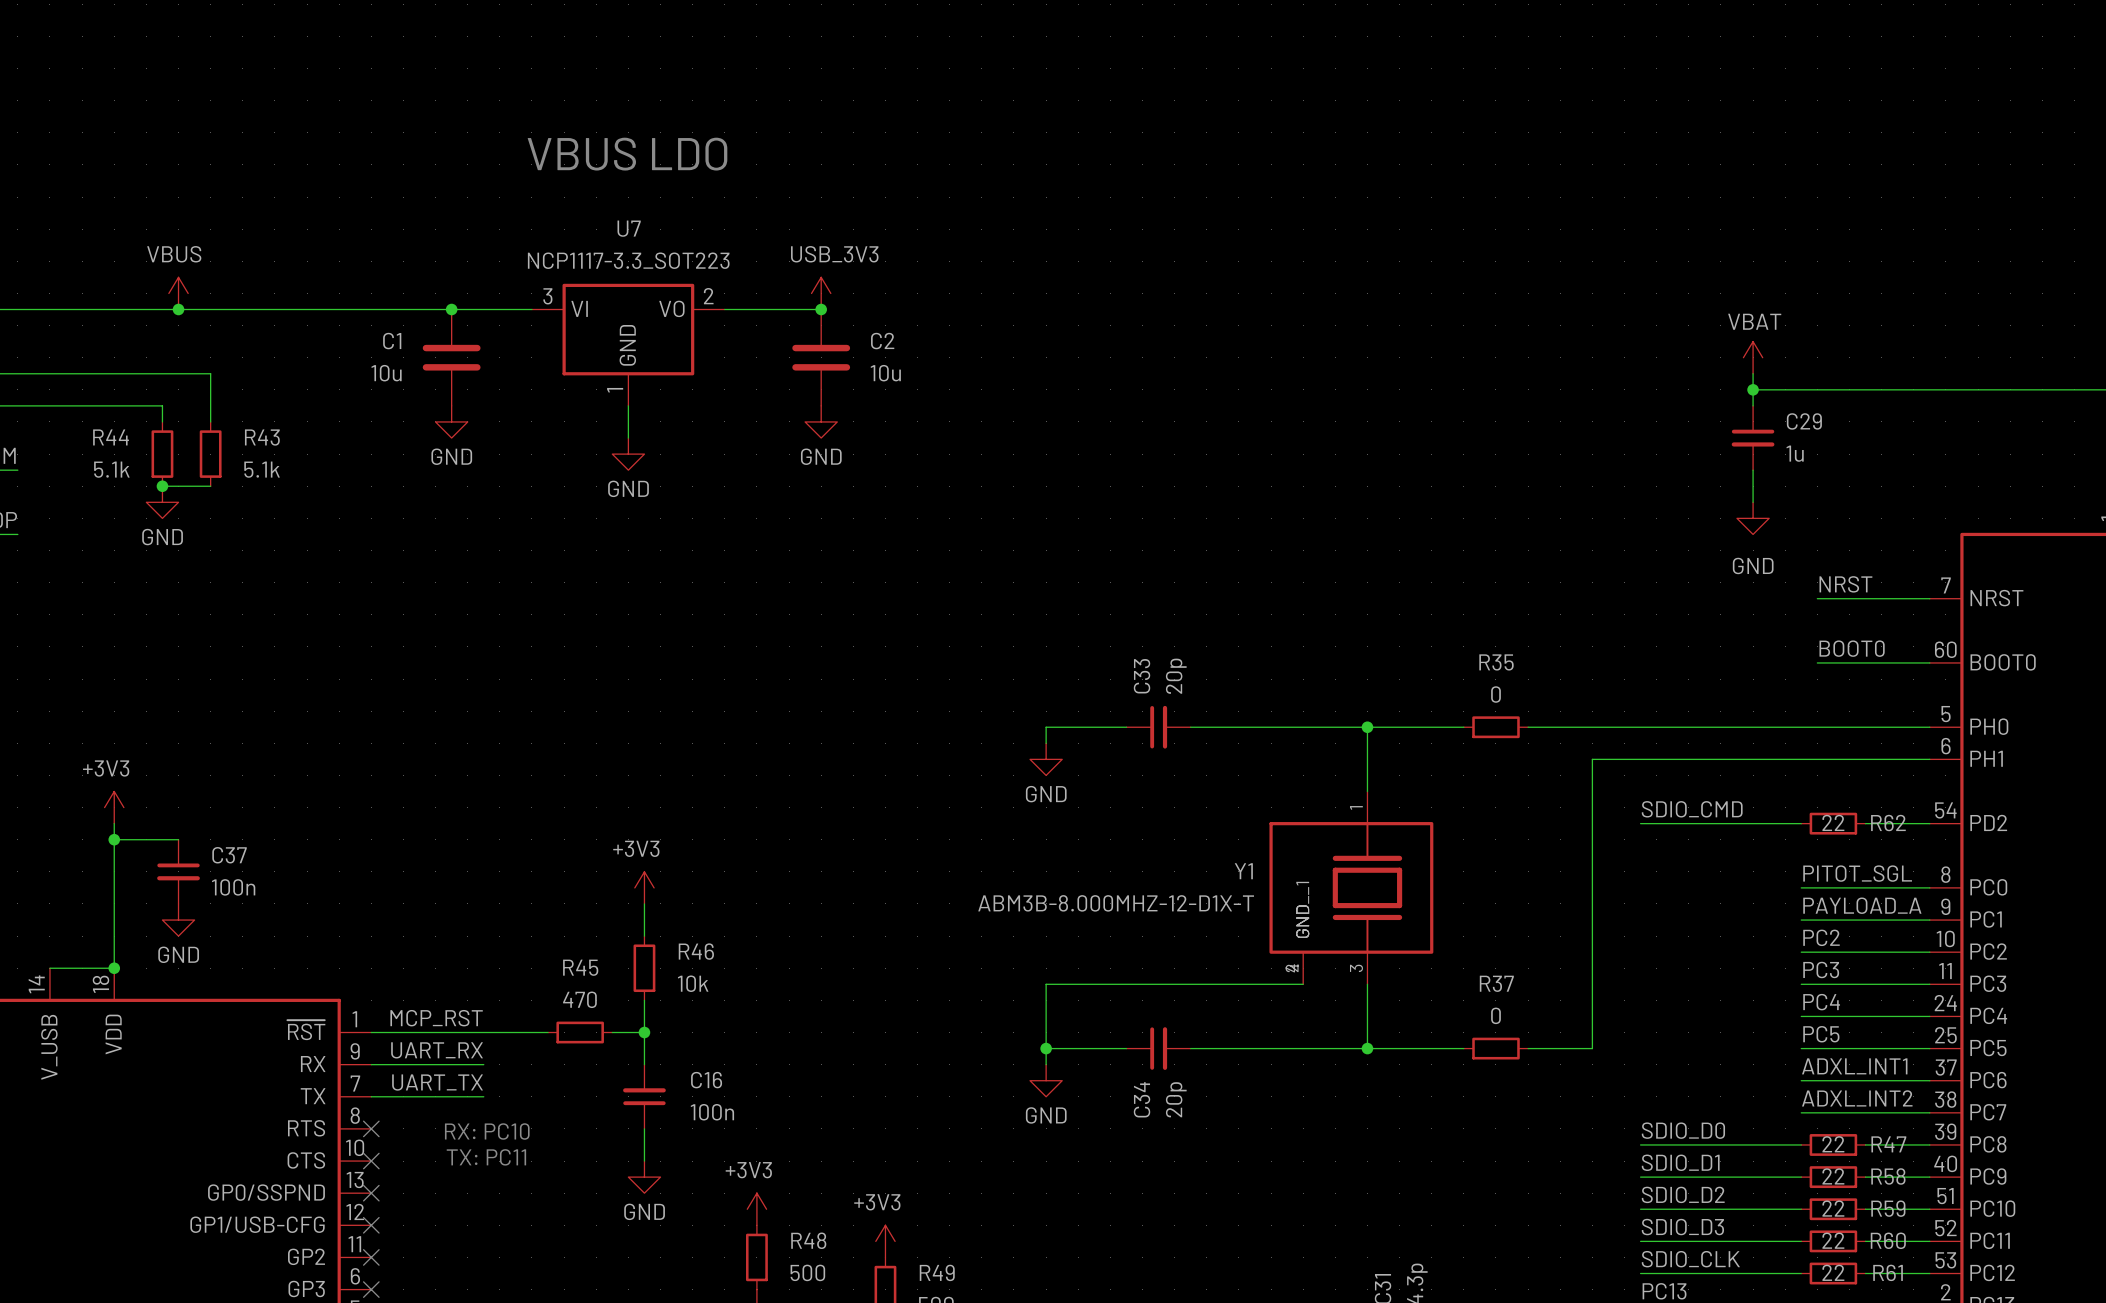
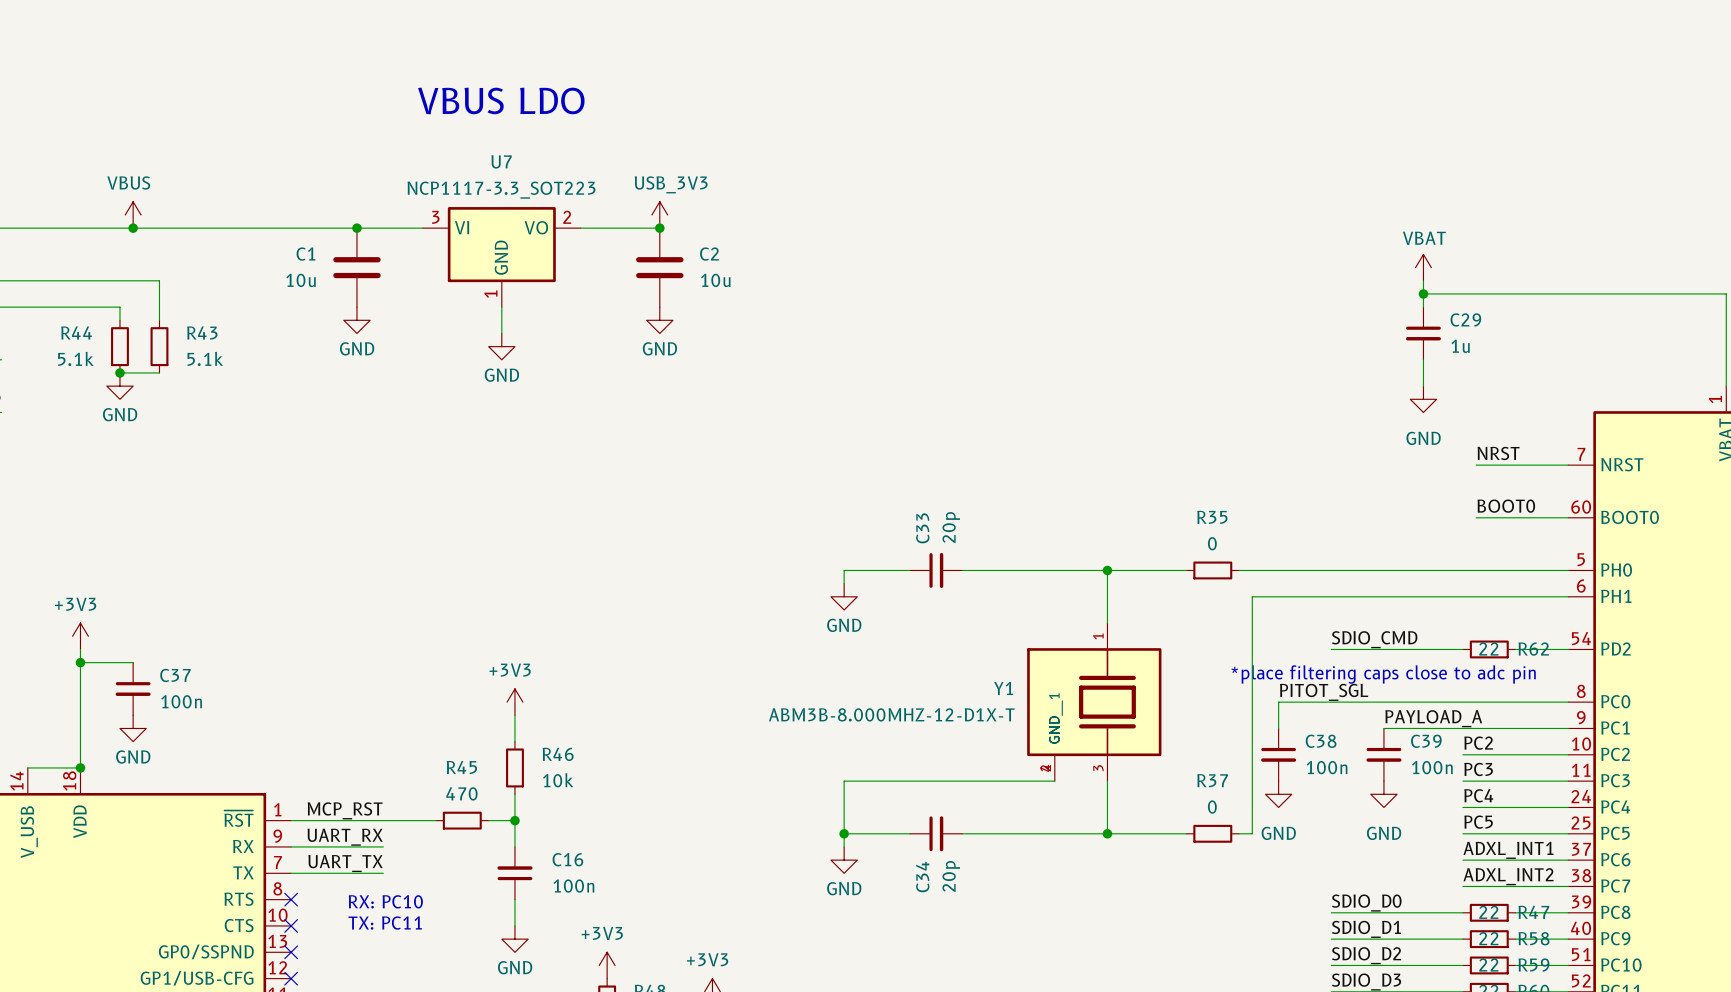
wire: (1592, 759) (1592, 1048) (1544, 1048) -> (1291, 596) (1252, 596) (1252, 833)
text: none -> *place filtering caps close to adc pin (1383, 674)
label position: PITOT_SGL (1857, 873) -> PITOT_SGL (1324, 692)
wire: none -> (1462, 702) (1278, 702) (1278, 728)
label position: PAYLOAD_A (1862, 905) -> PAYLOAD_A (1433, 718)
wire: none -> (1383, 728) (1462, 728)
C38: none -> 100n (1278, 754)
C39: none -> 100n (1383, 754)
power symbol: none -> GND (1278, 794)
power symbol: none -> GND (1383, 794)

